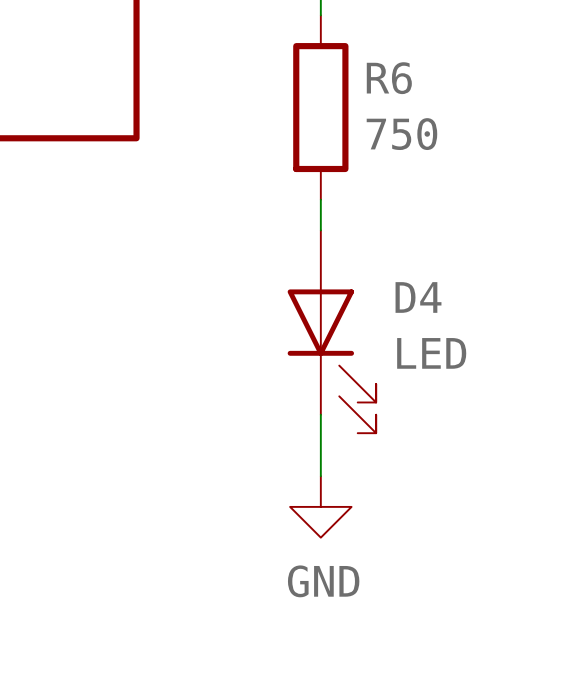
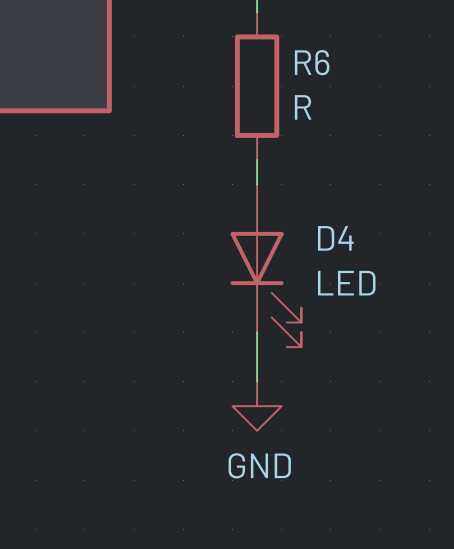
R6 value: 750 (401, 134) -> R (303, 107)

